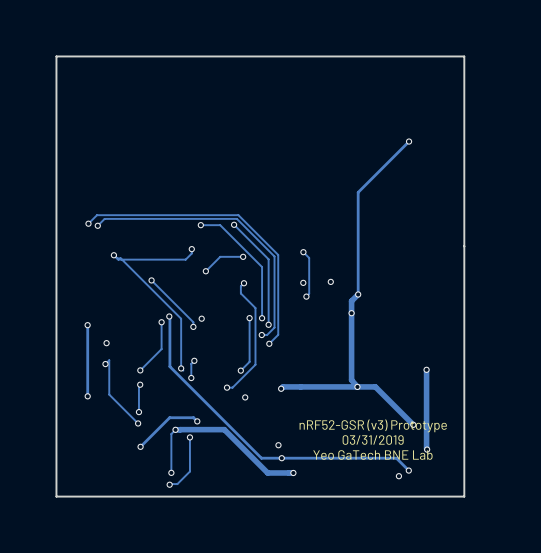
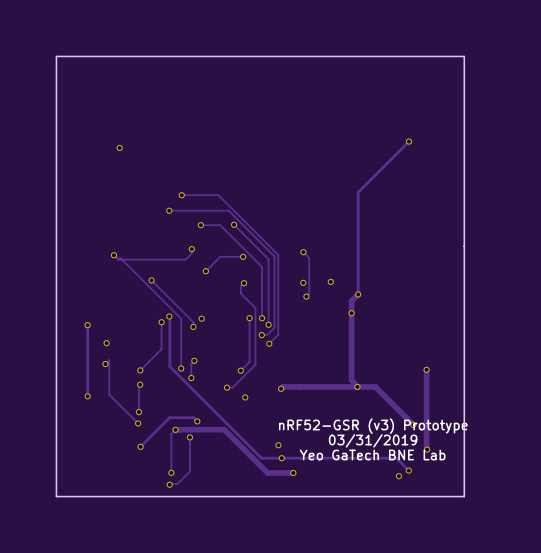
via: none -> (119, 147)
via: none -> (181, 195)
via: none -> (169, 210)
track: (238, 215) (97, 215) (88, 223) -> (238, 215) (218, 195) (181, 195)
track: (236, 218) (104, 218) (97, 225) -> (236, 218) (228, 210) (169, 210)
via: (88, 223) -> none
via: (97, 225) -> none

